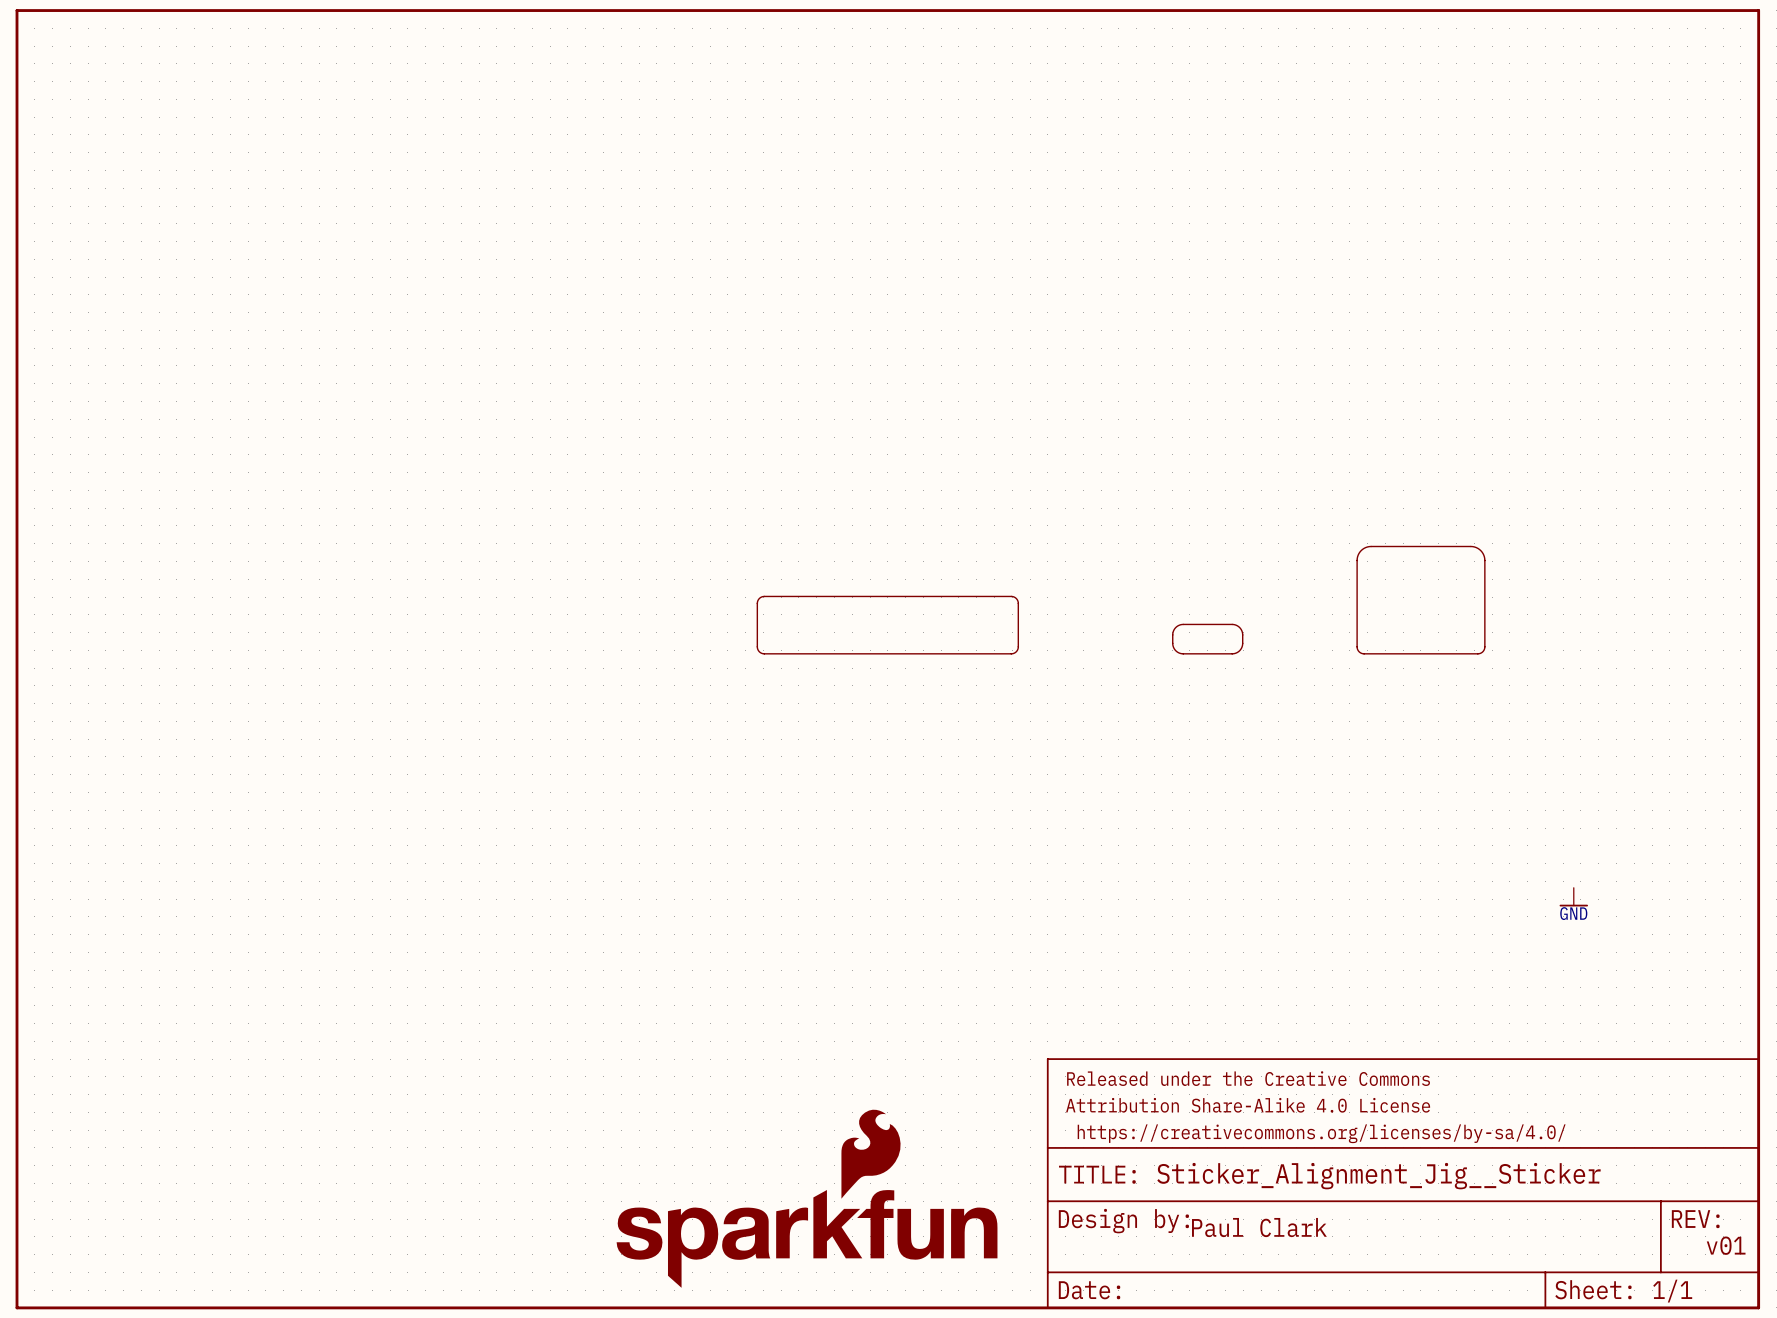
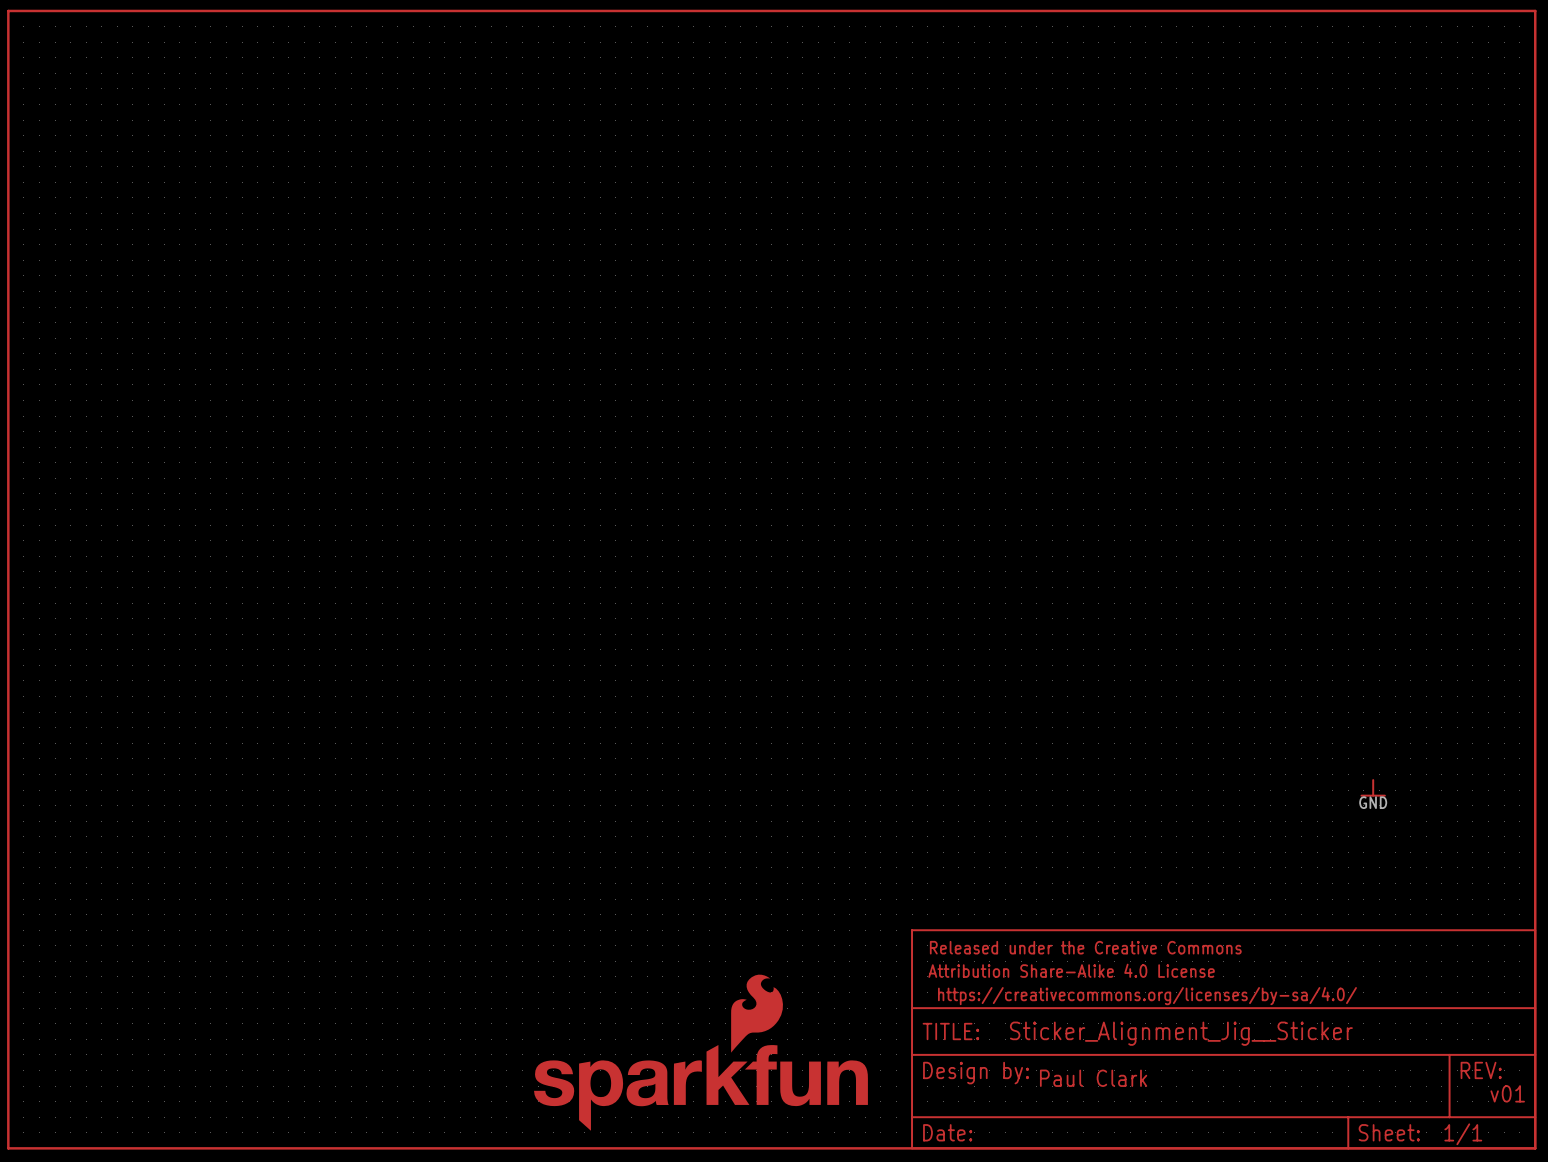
part: (1420, 600) -> none
part: (887, 625) -> none
part: (1207, 639) -> none

